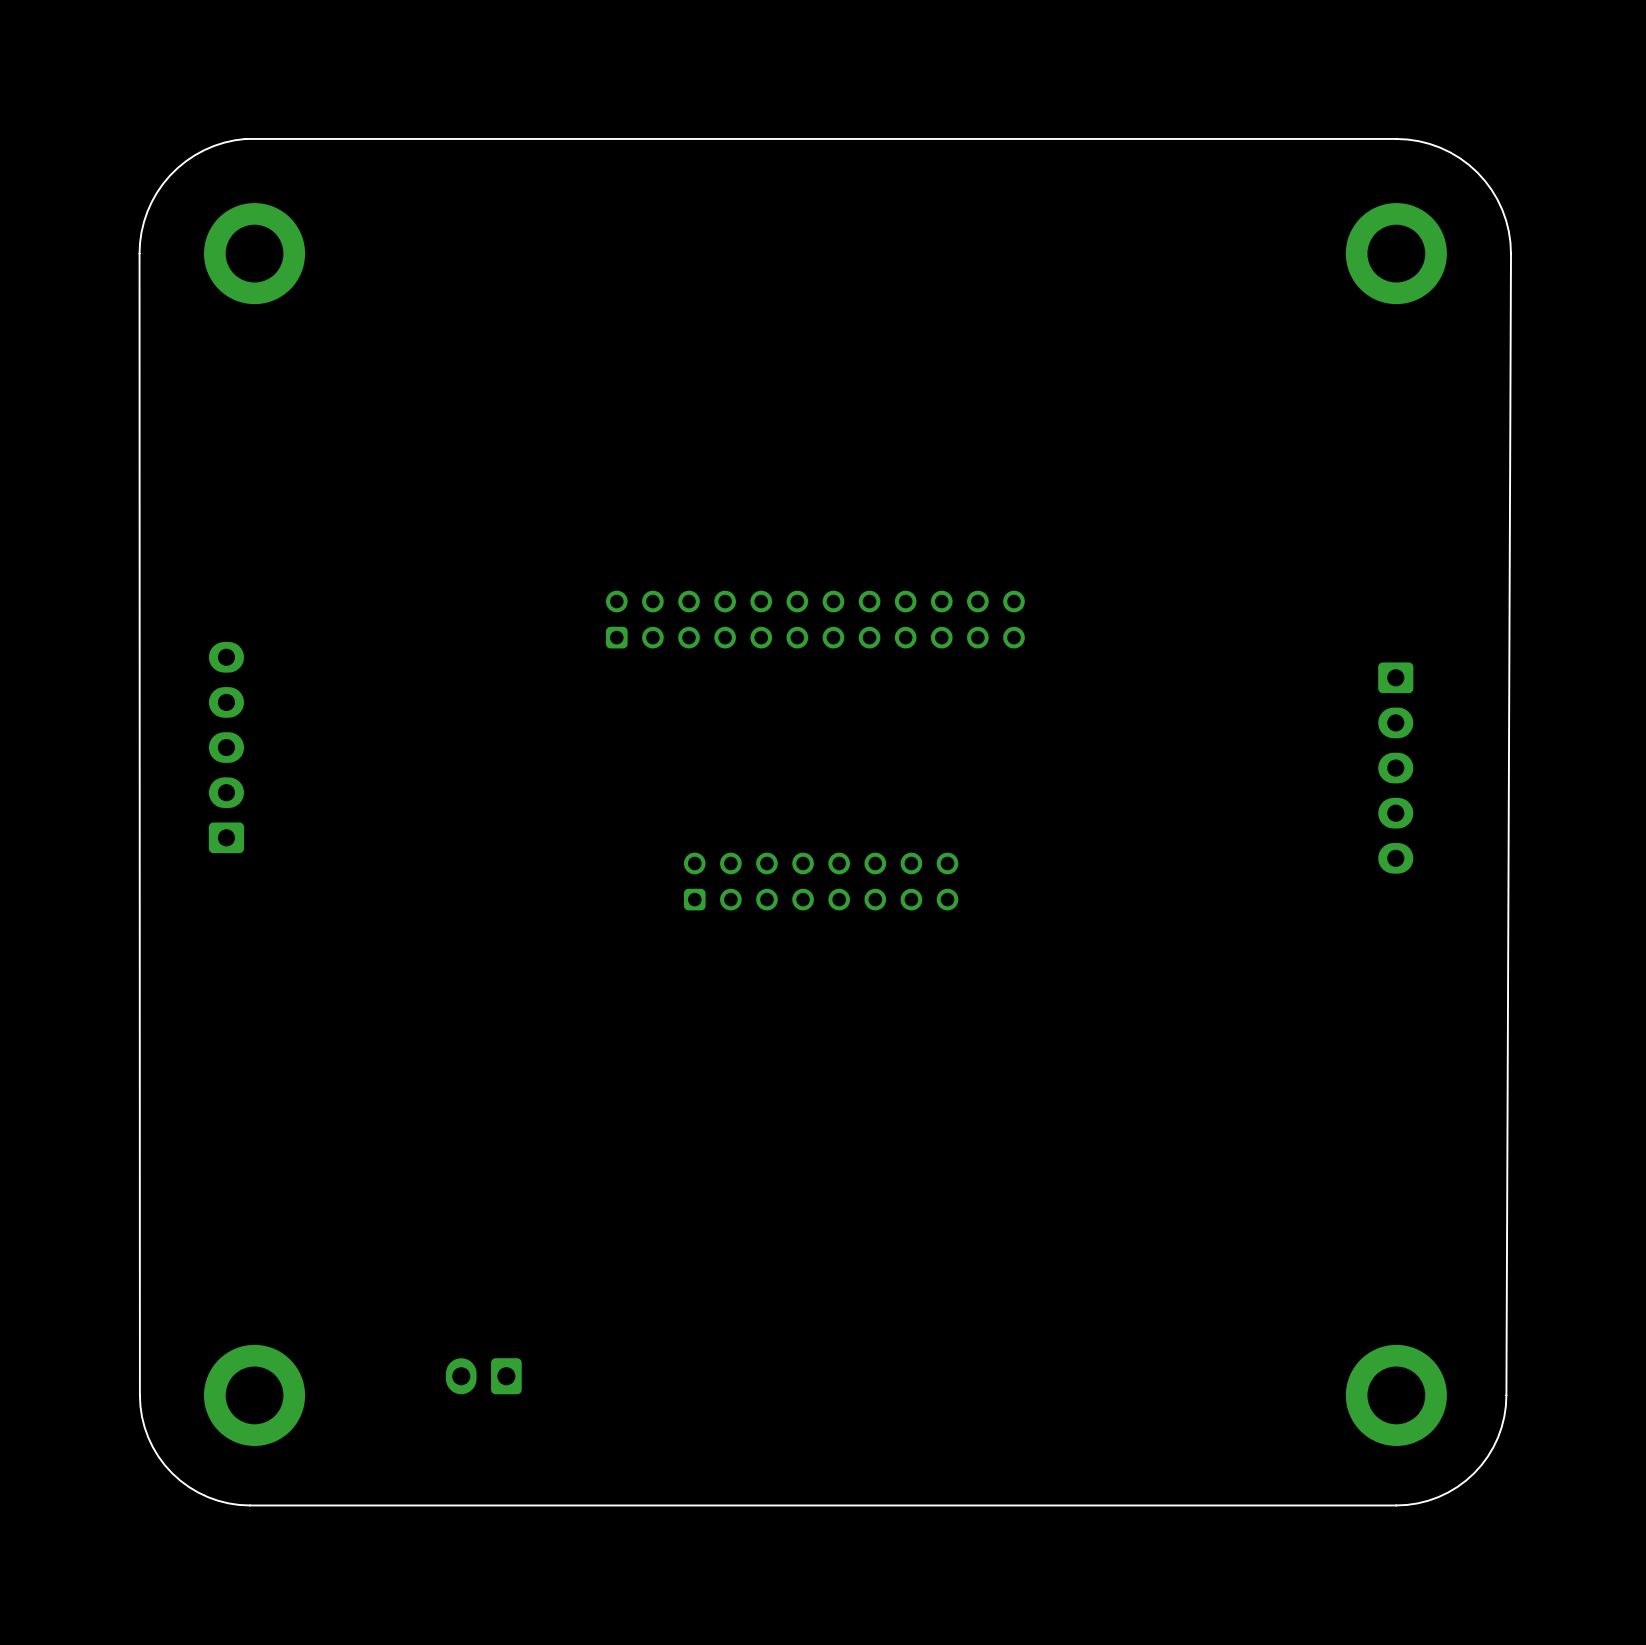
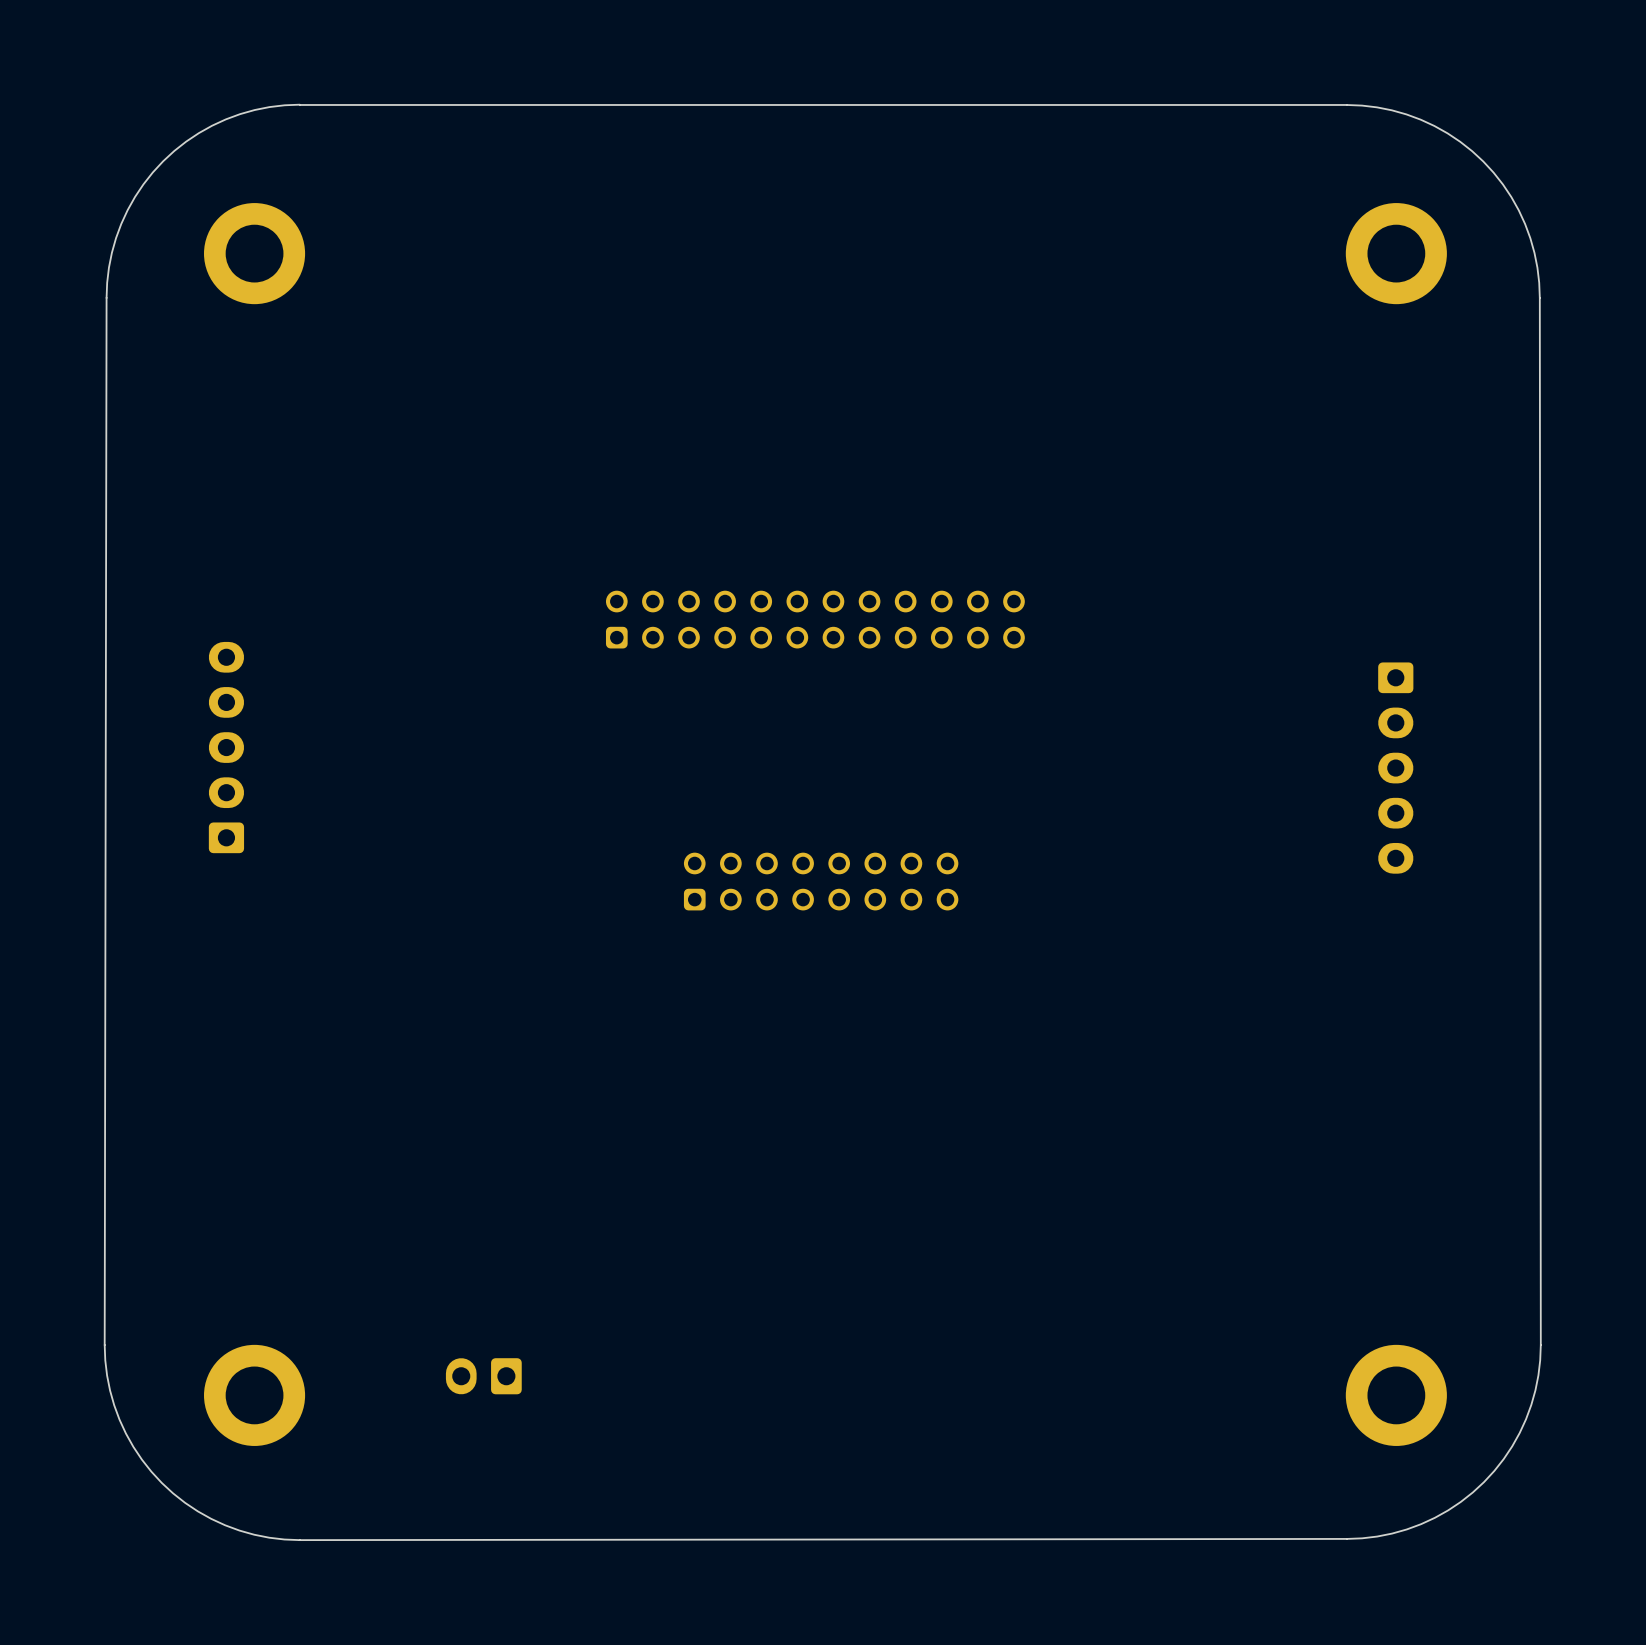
board edge: (1396, 138) (245, 138) (224, 142) (204, 150) (185, 161) (170, 175) (157, 192) (147, 211) (141, 232) (139, 253) (139, 1395) (142, 1416) (148, 1437) (158, 1456) (172, 1473) (188, 1486) (207, 1497) (228, 1503) (249, 1505) (1396, 1505) (1417, 1503) (1438, 1497) (1457, 1486) (1474, 1473) (1487, 1456) (1498, 1437) (1504, 1416) (1506, 1395) (1510, 242) (1506, 220) (1497, 199) (1484, 180) (1469, 164) (1450, 152) (1429, 143) (1396, 138) -> (299, 104) (269, 107) (240, 114) (198, 133) (174, 150) (152, 172) (127, 210) (116, 238) (107, 282) (104, 1345) (110, 1390) (119, 1419) (133, 1446) (151, 1471) (185, 1502) (211, 1518) (254, 1534) (299, 1540) (1362, 1538) (1392, 1533) (1421, 1524) (1448, 1510) (1472, 1492) (1503, 1458) (1519, 1433) (1535, 1390) (1540, 1345) (1539, 282) (1534, 252) (1525, 224) (1511, 197) (1493, 172) (1460, 141) (1434, 126) (1391, 110) (1362, 105) (299, 104)

